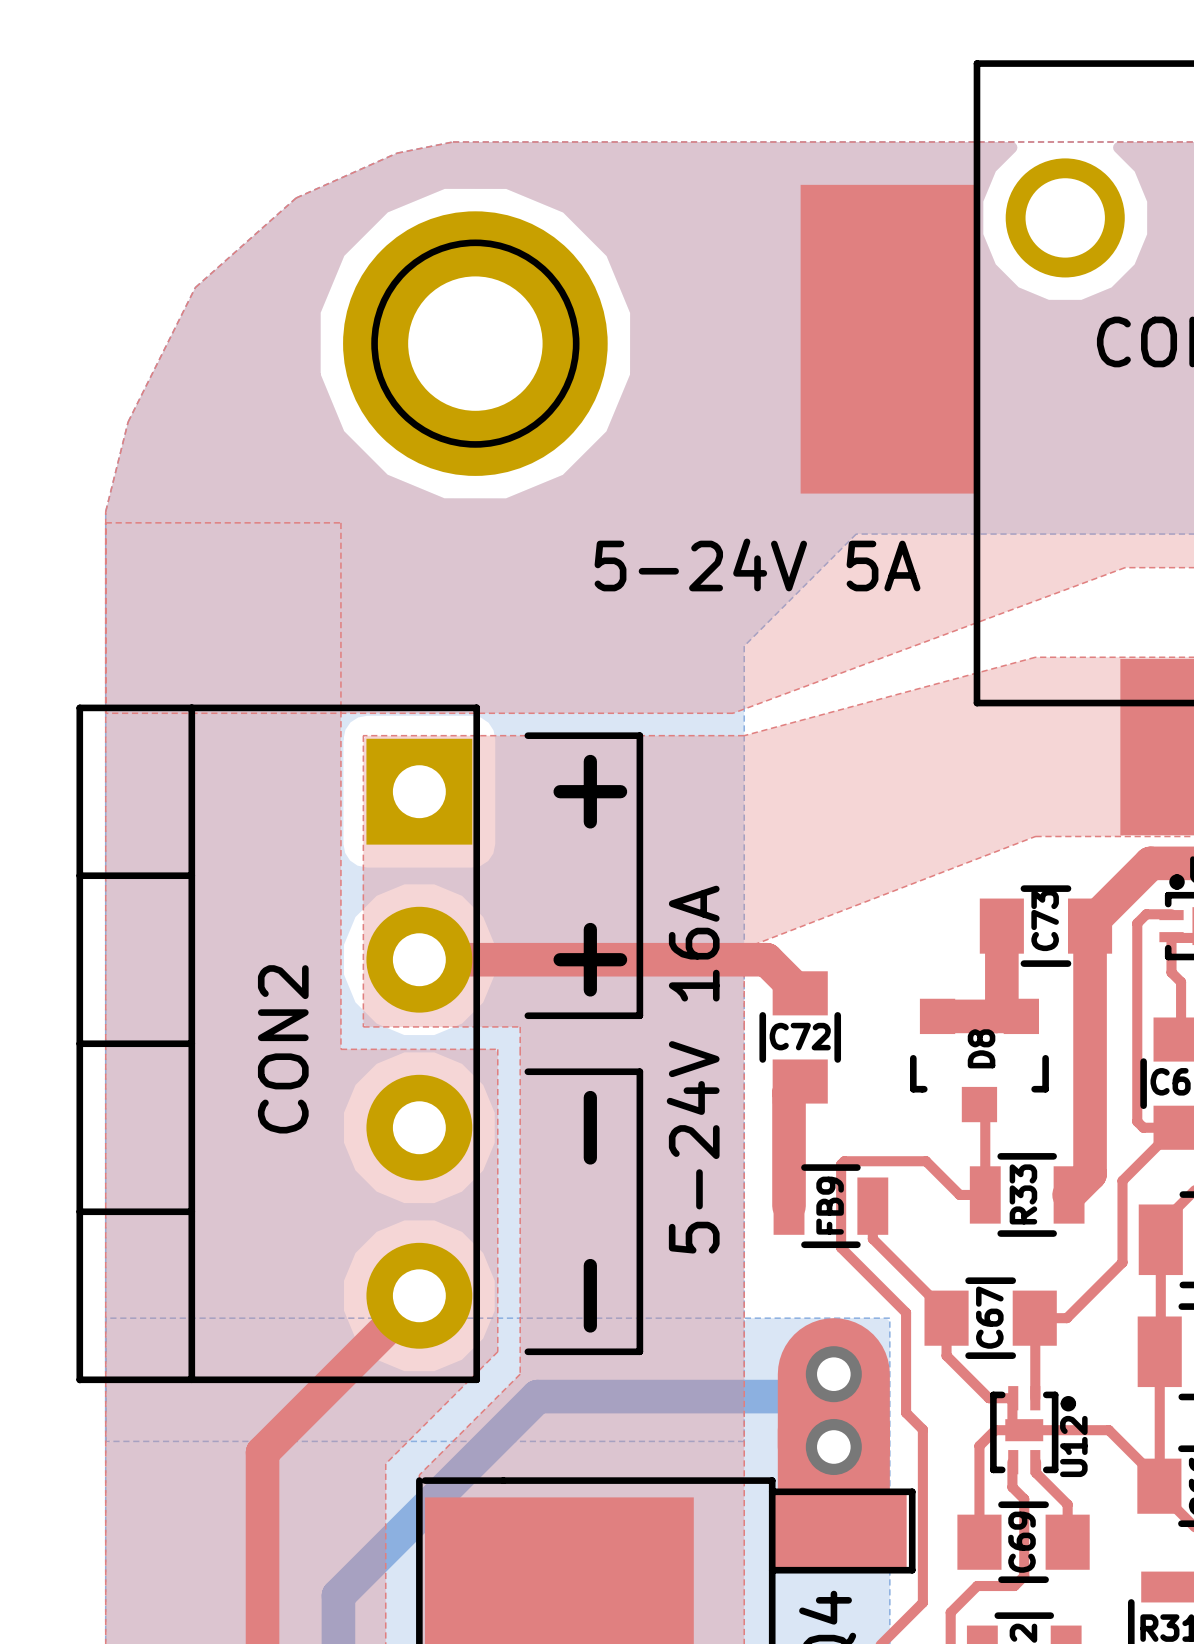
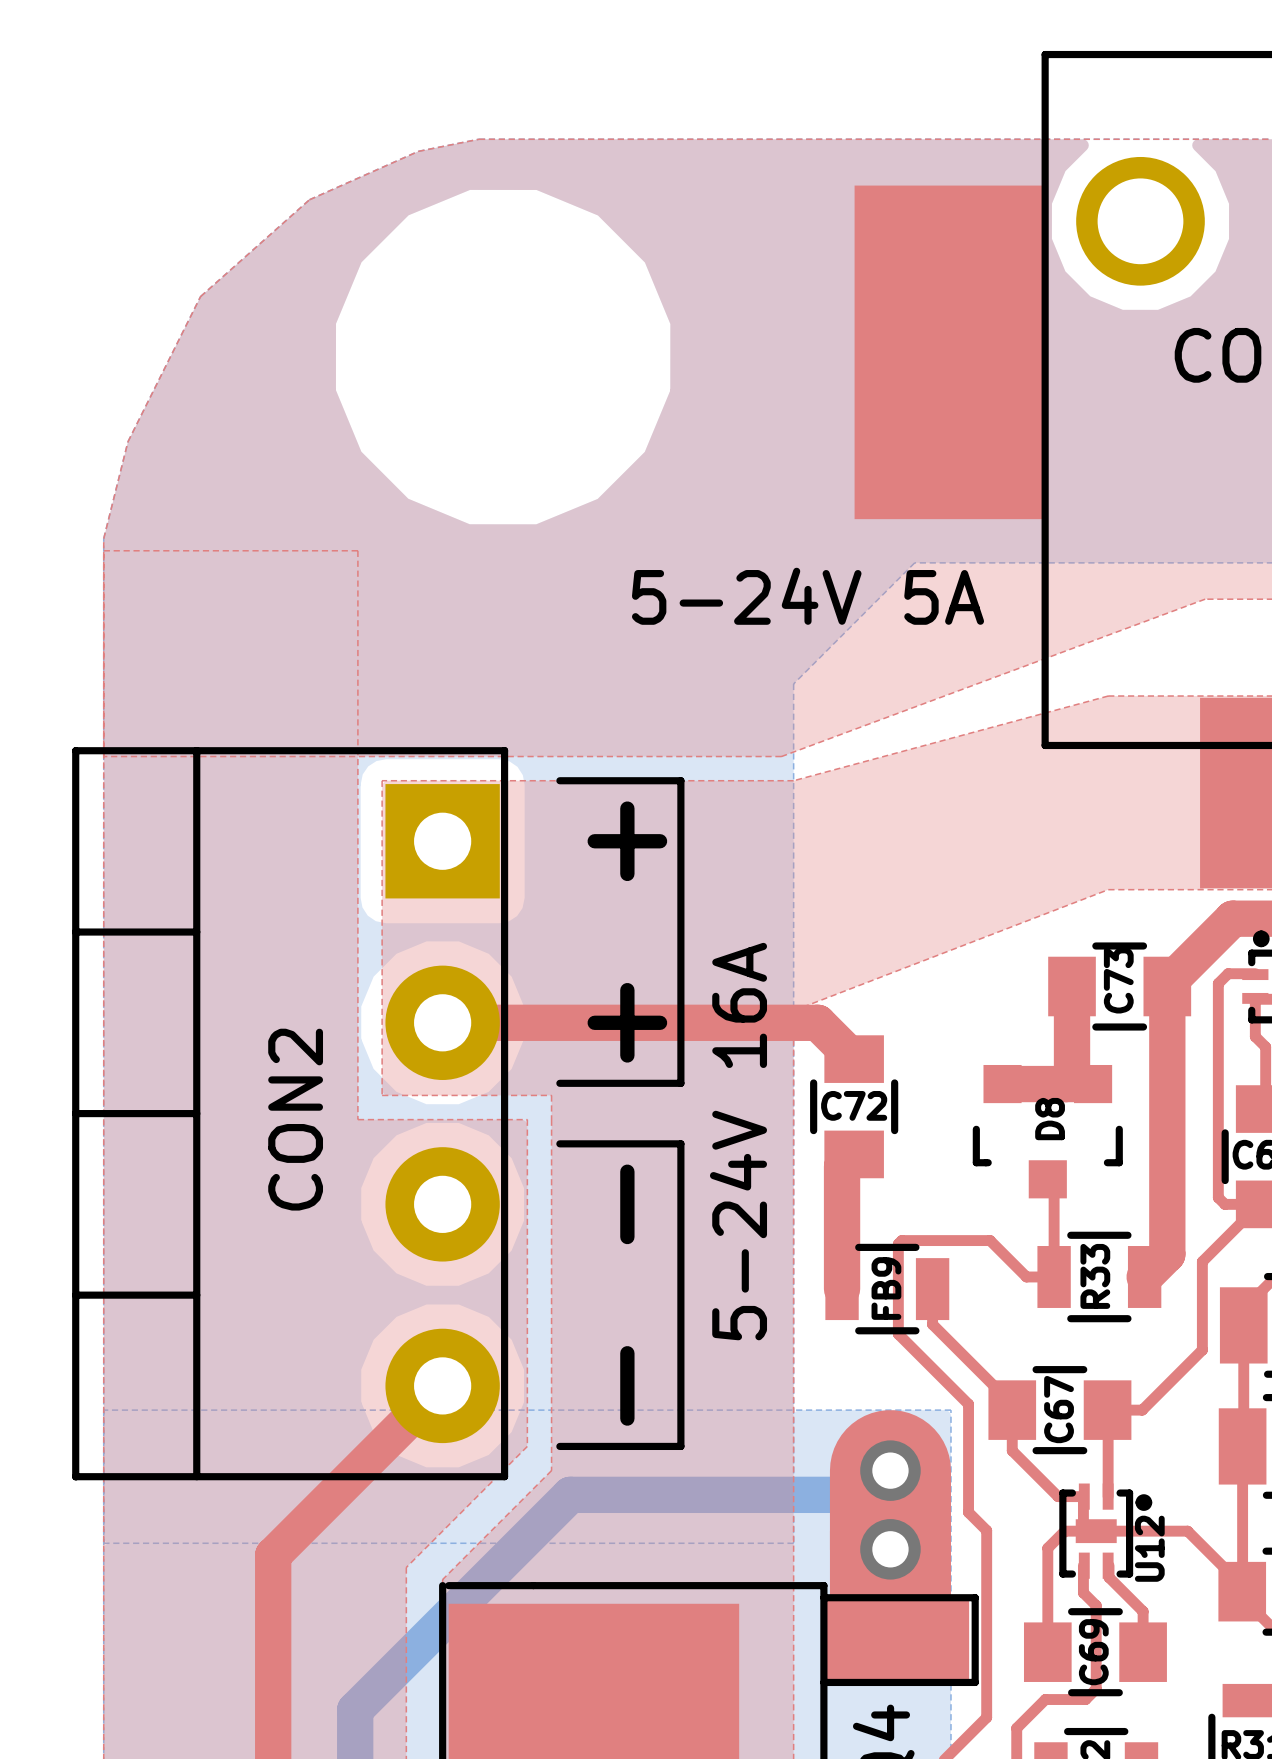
part: (475, 343) -> none

